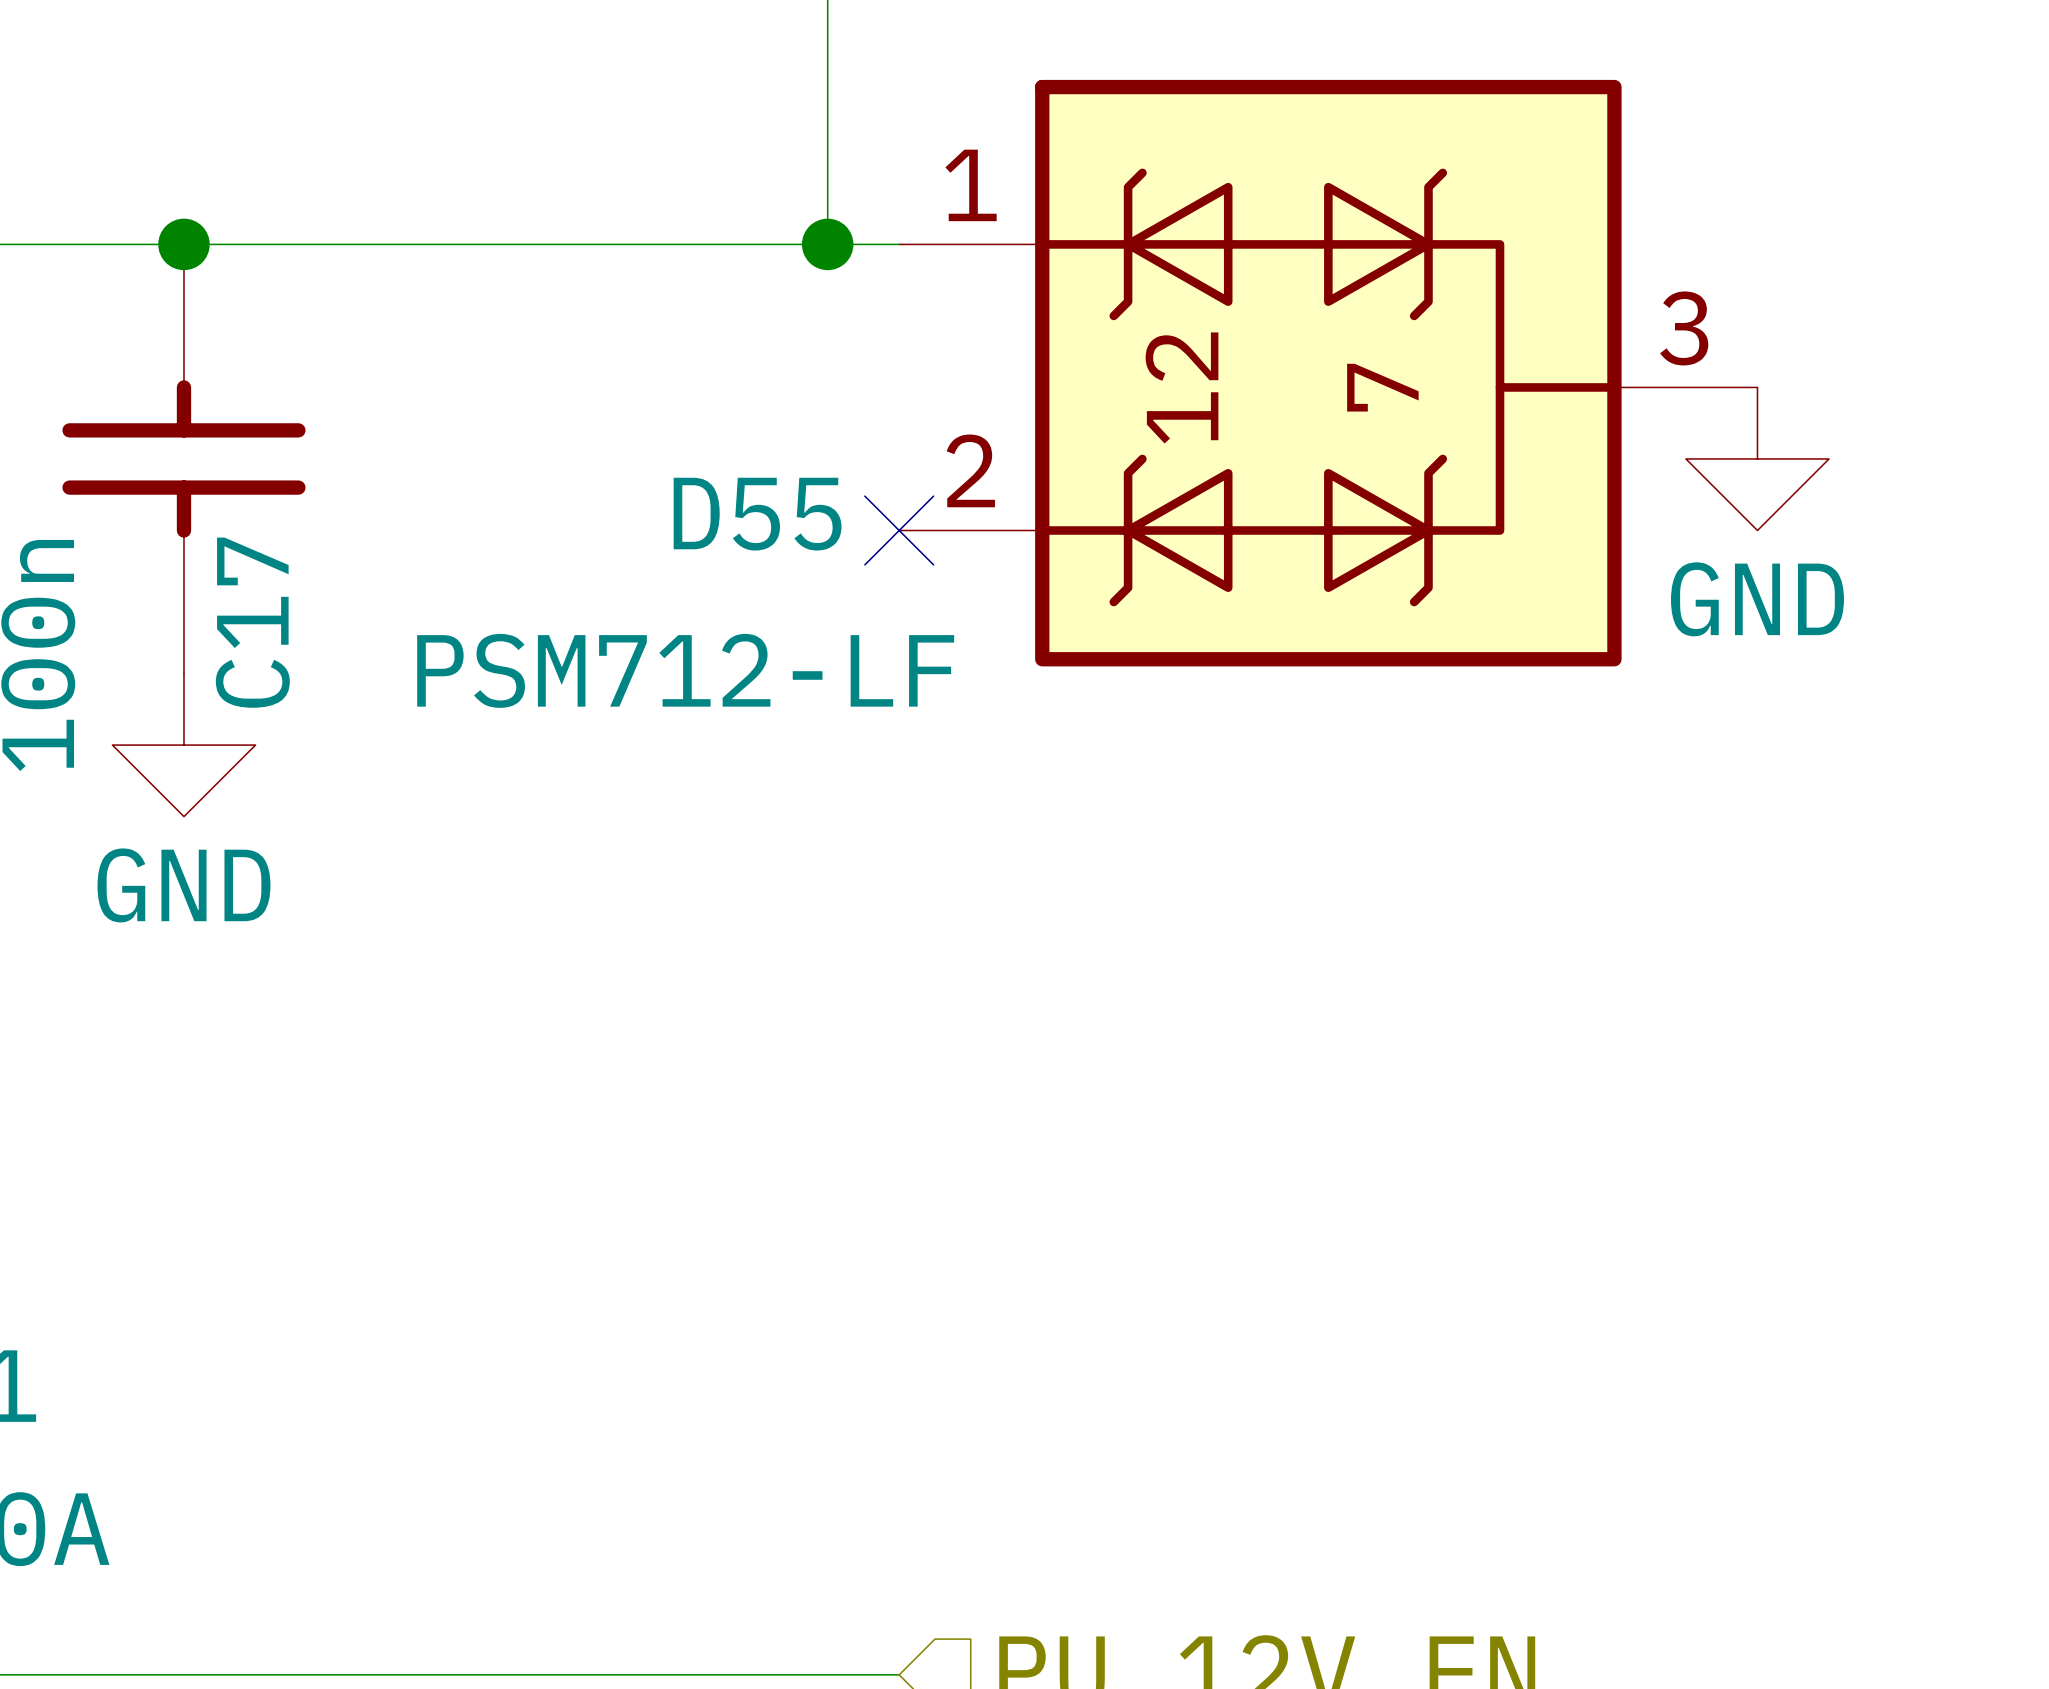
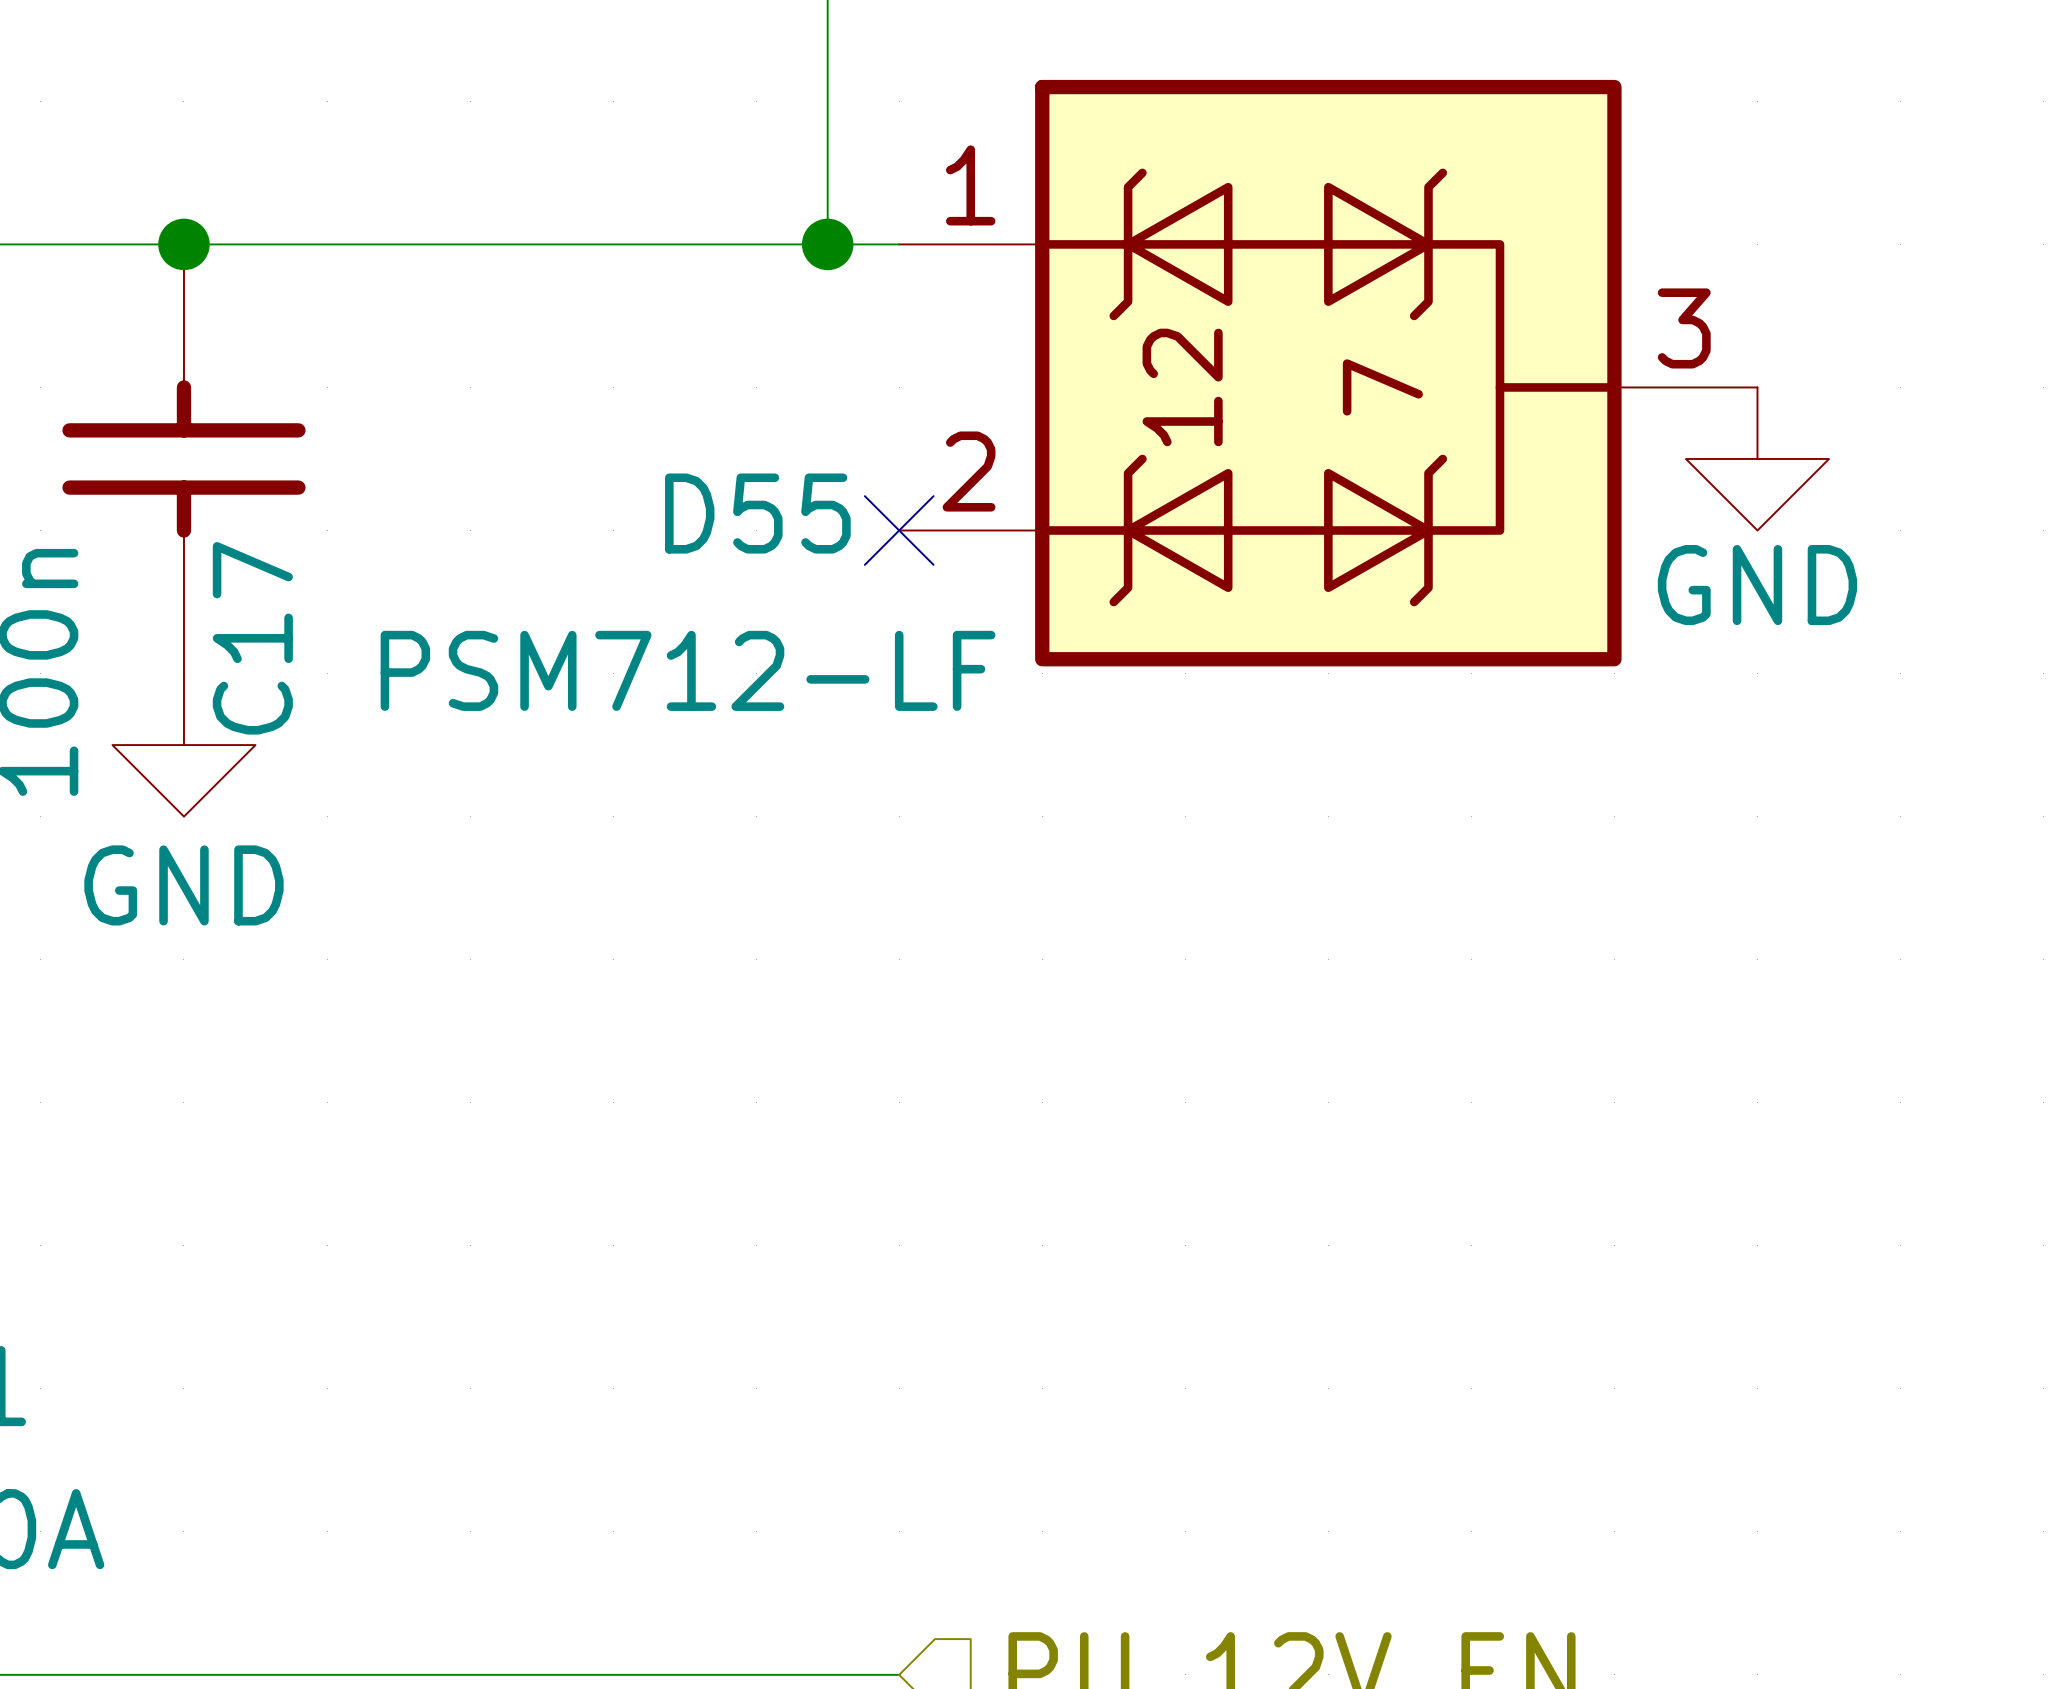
power symbol text position: GND (1757, 599) -> GND (1757, 585)

